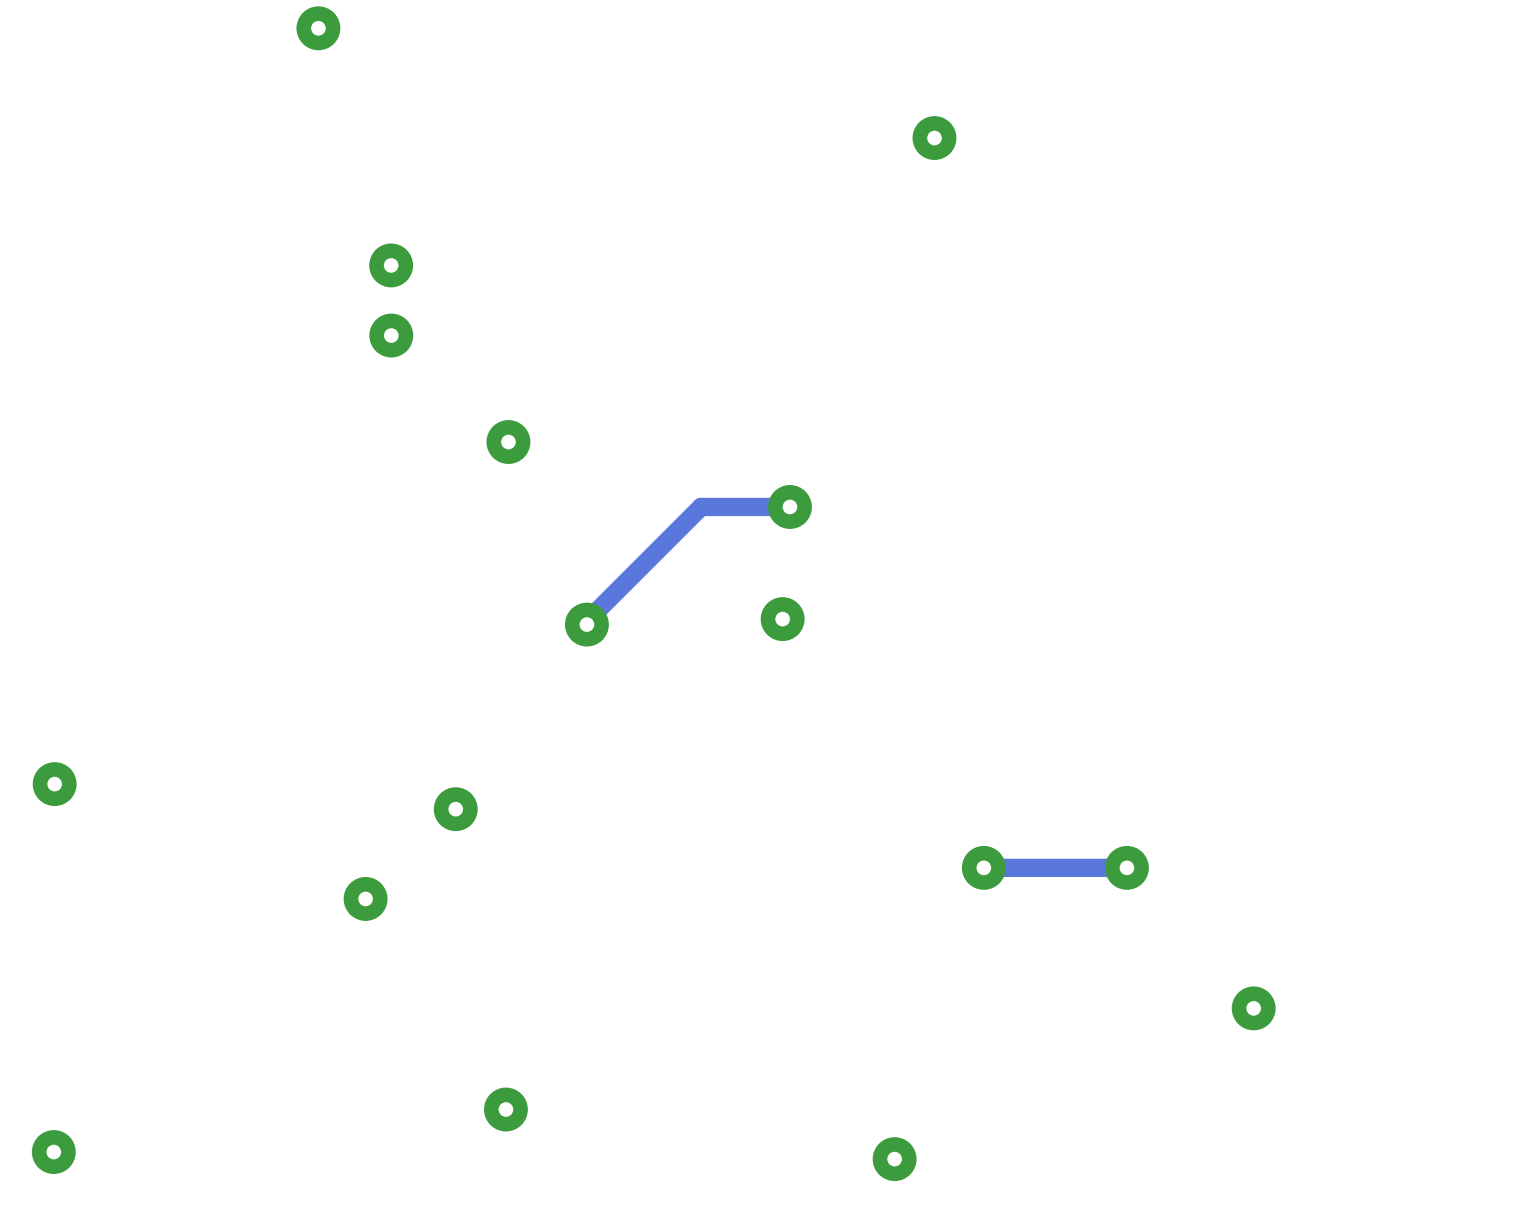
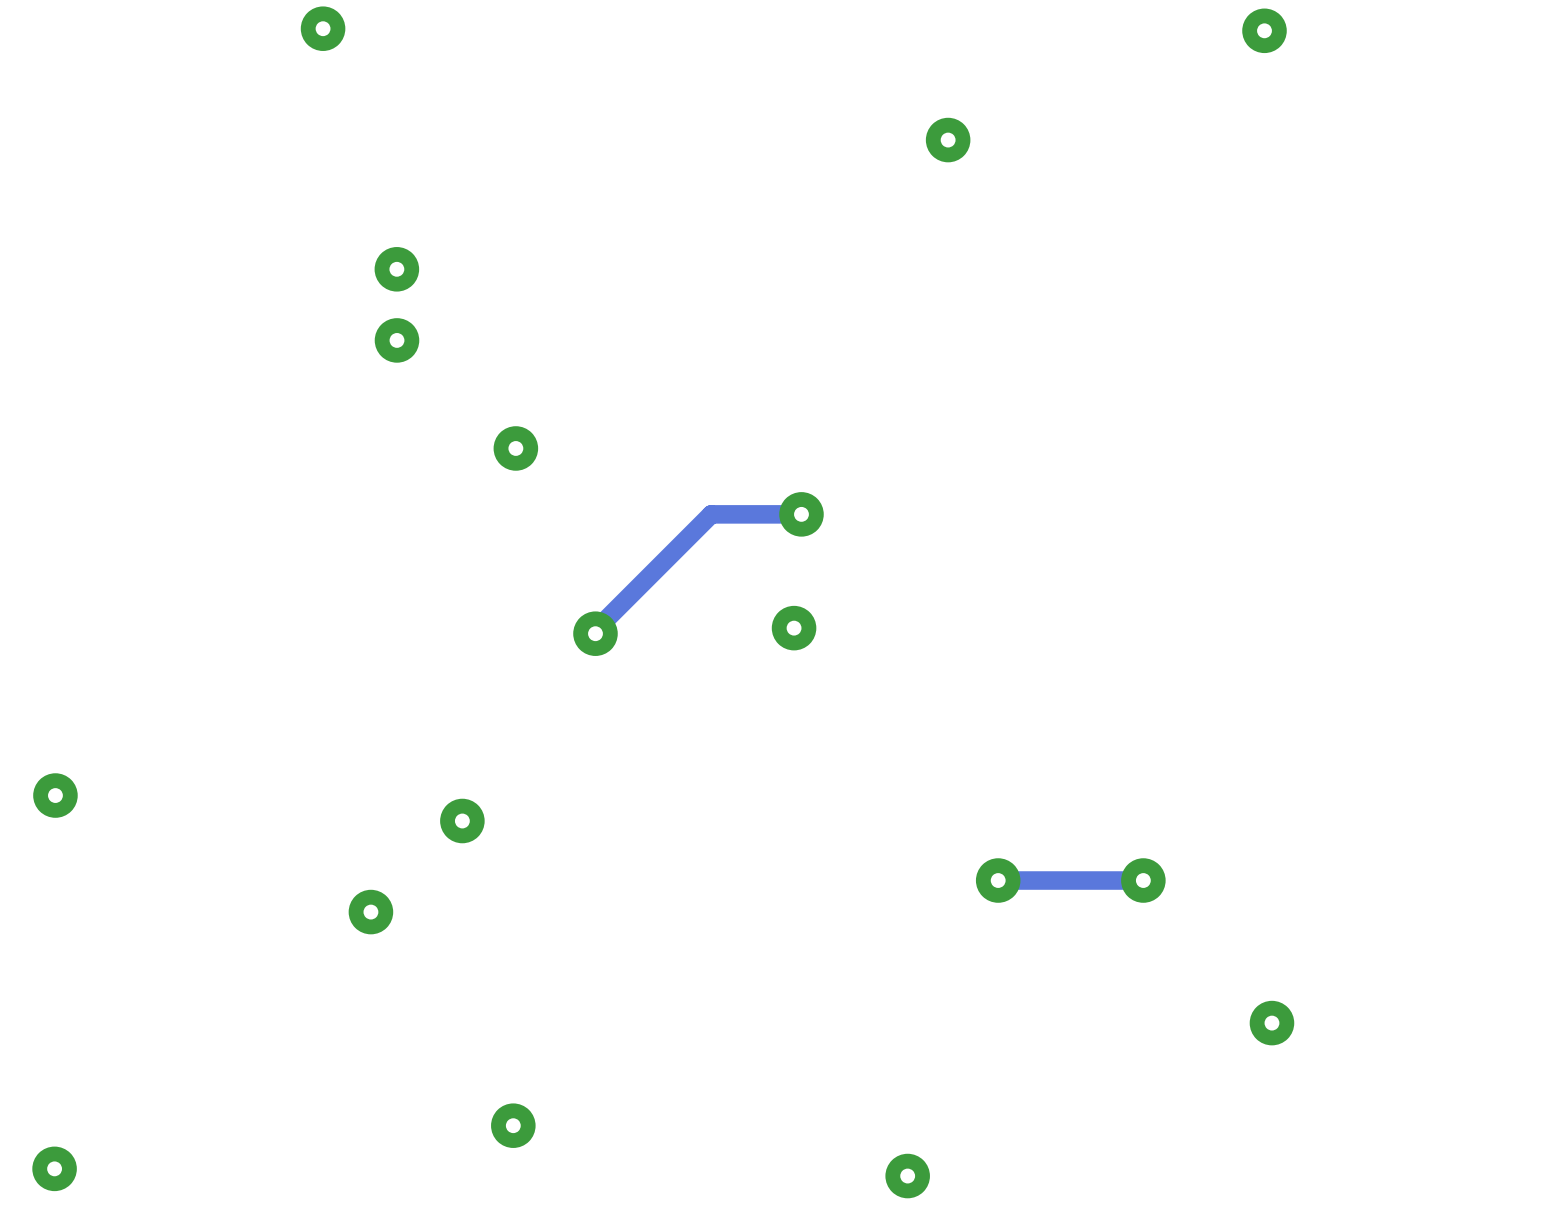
via: none -> (1264, 30)

